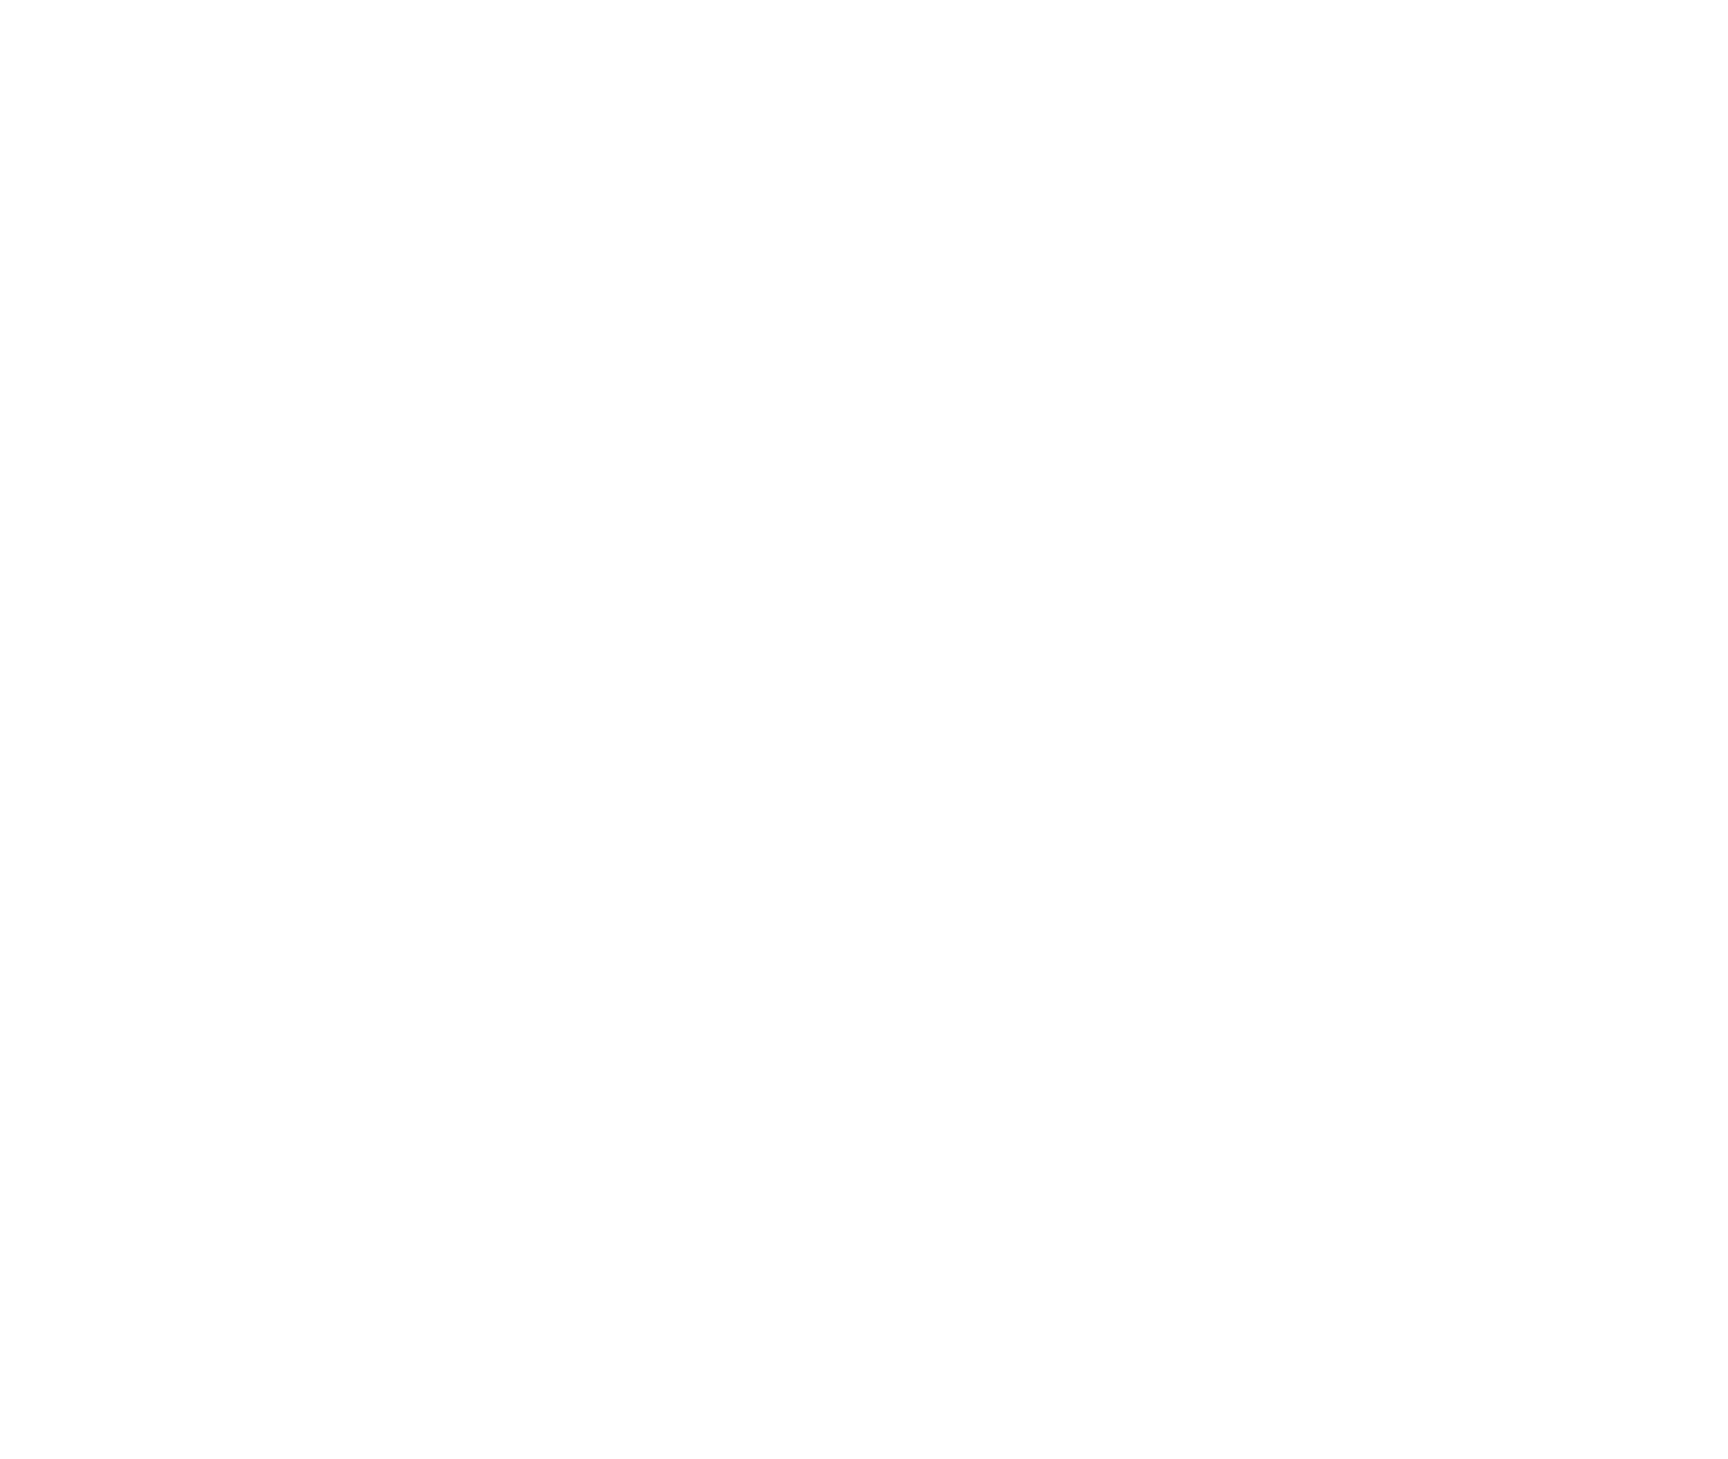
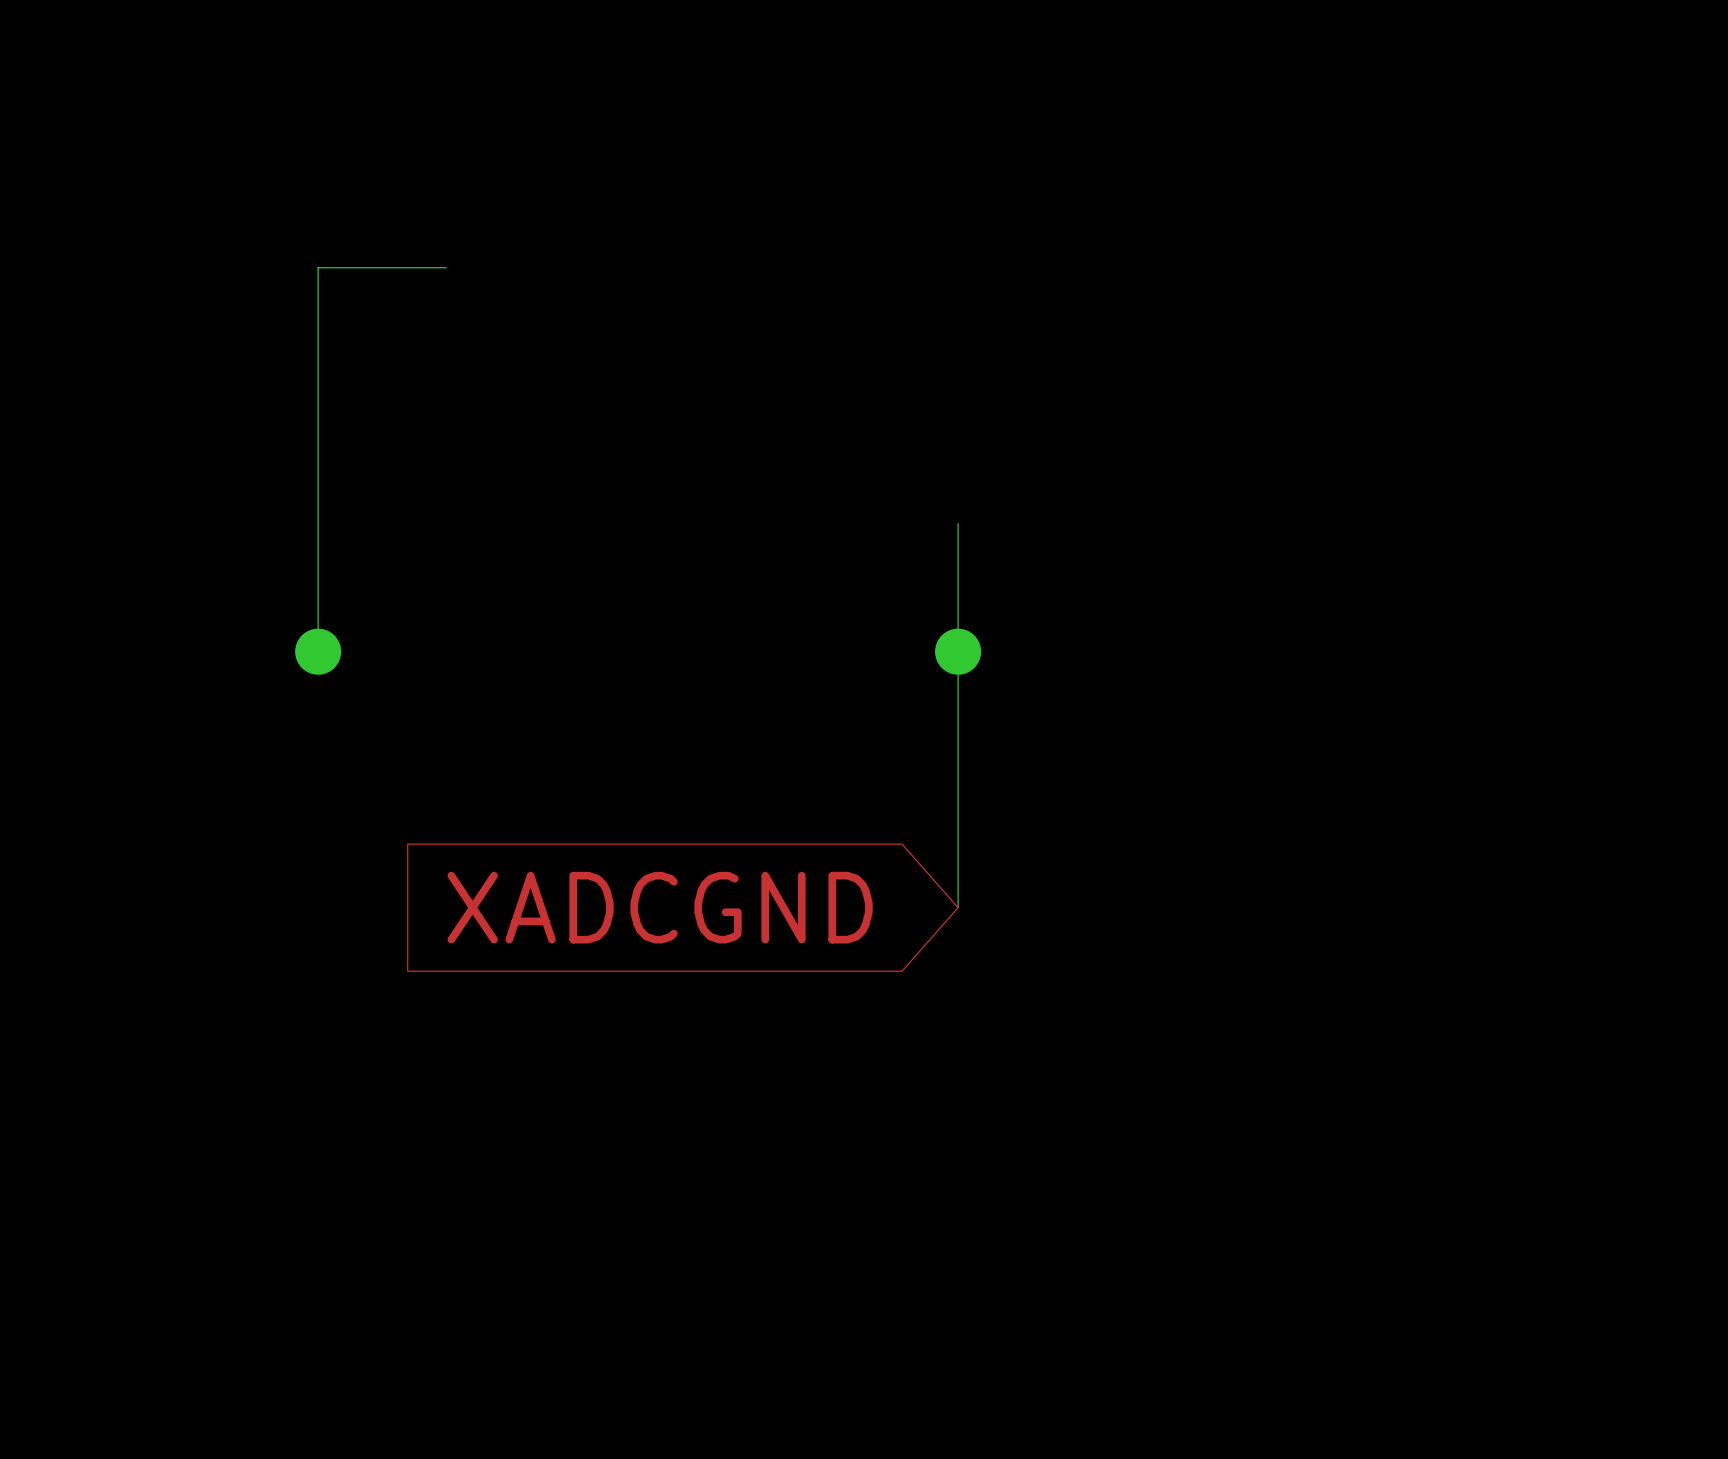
wire: none -> (446, 267) (318, 267) (318, 651)
wire: none -> (958, 523) (958, 907)
junction: none -> (318, 651)
junction: none -> (958, 651)
global label: none -> XADCGND (660, 907)

